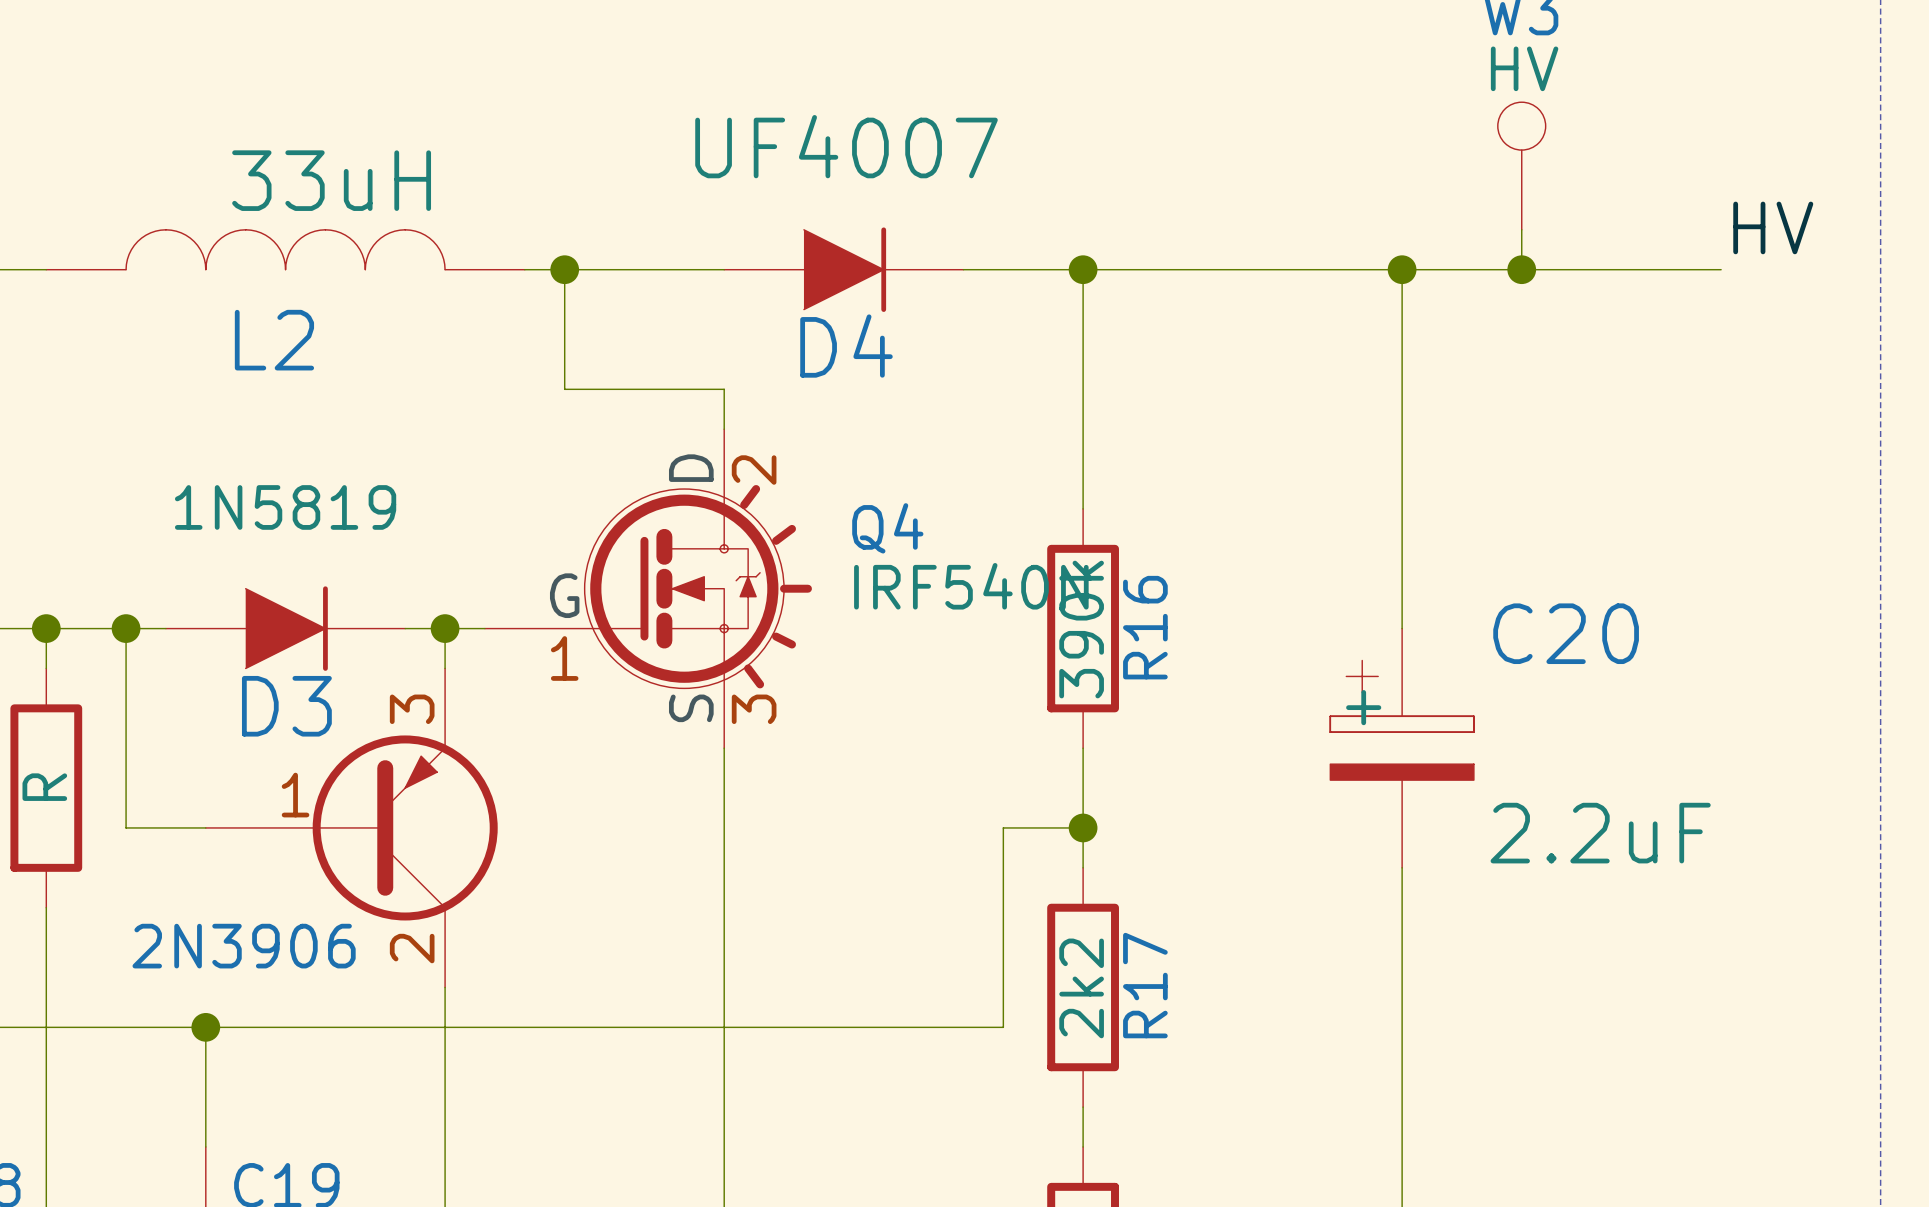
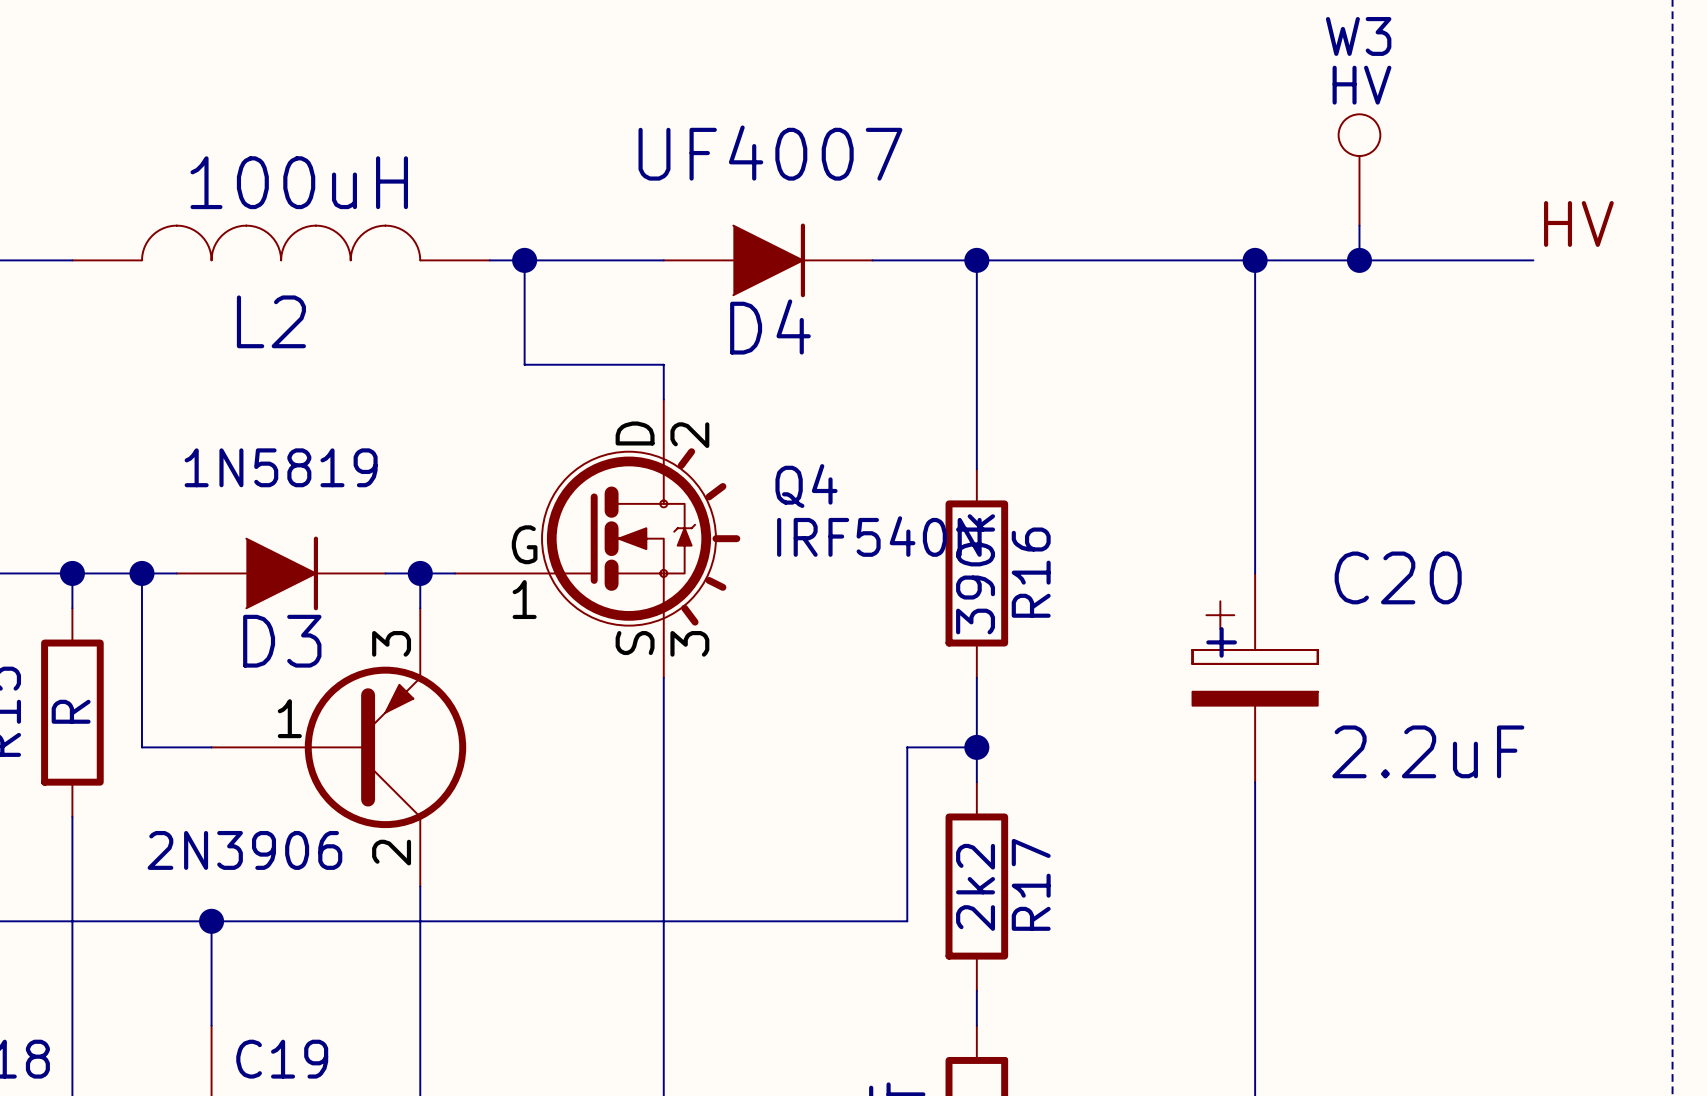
L2 value: 33uH (331, 180) -> 100uH (299, 182)

